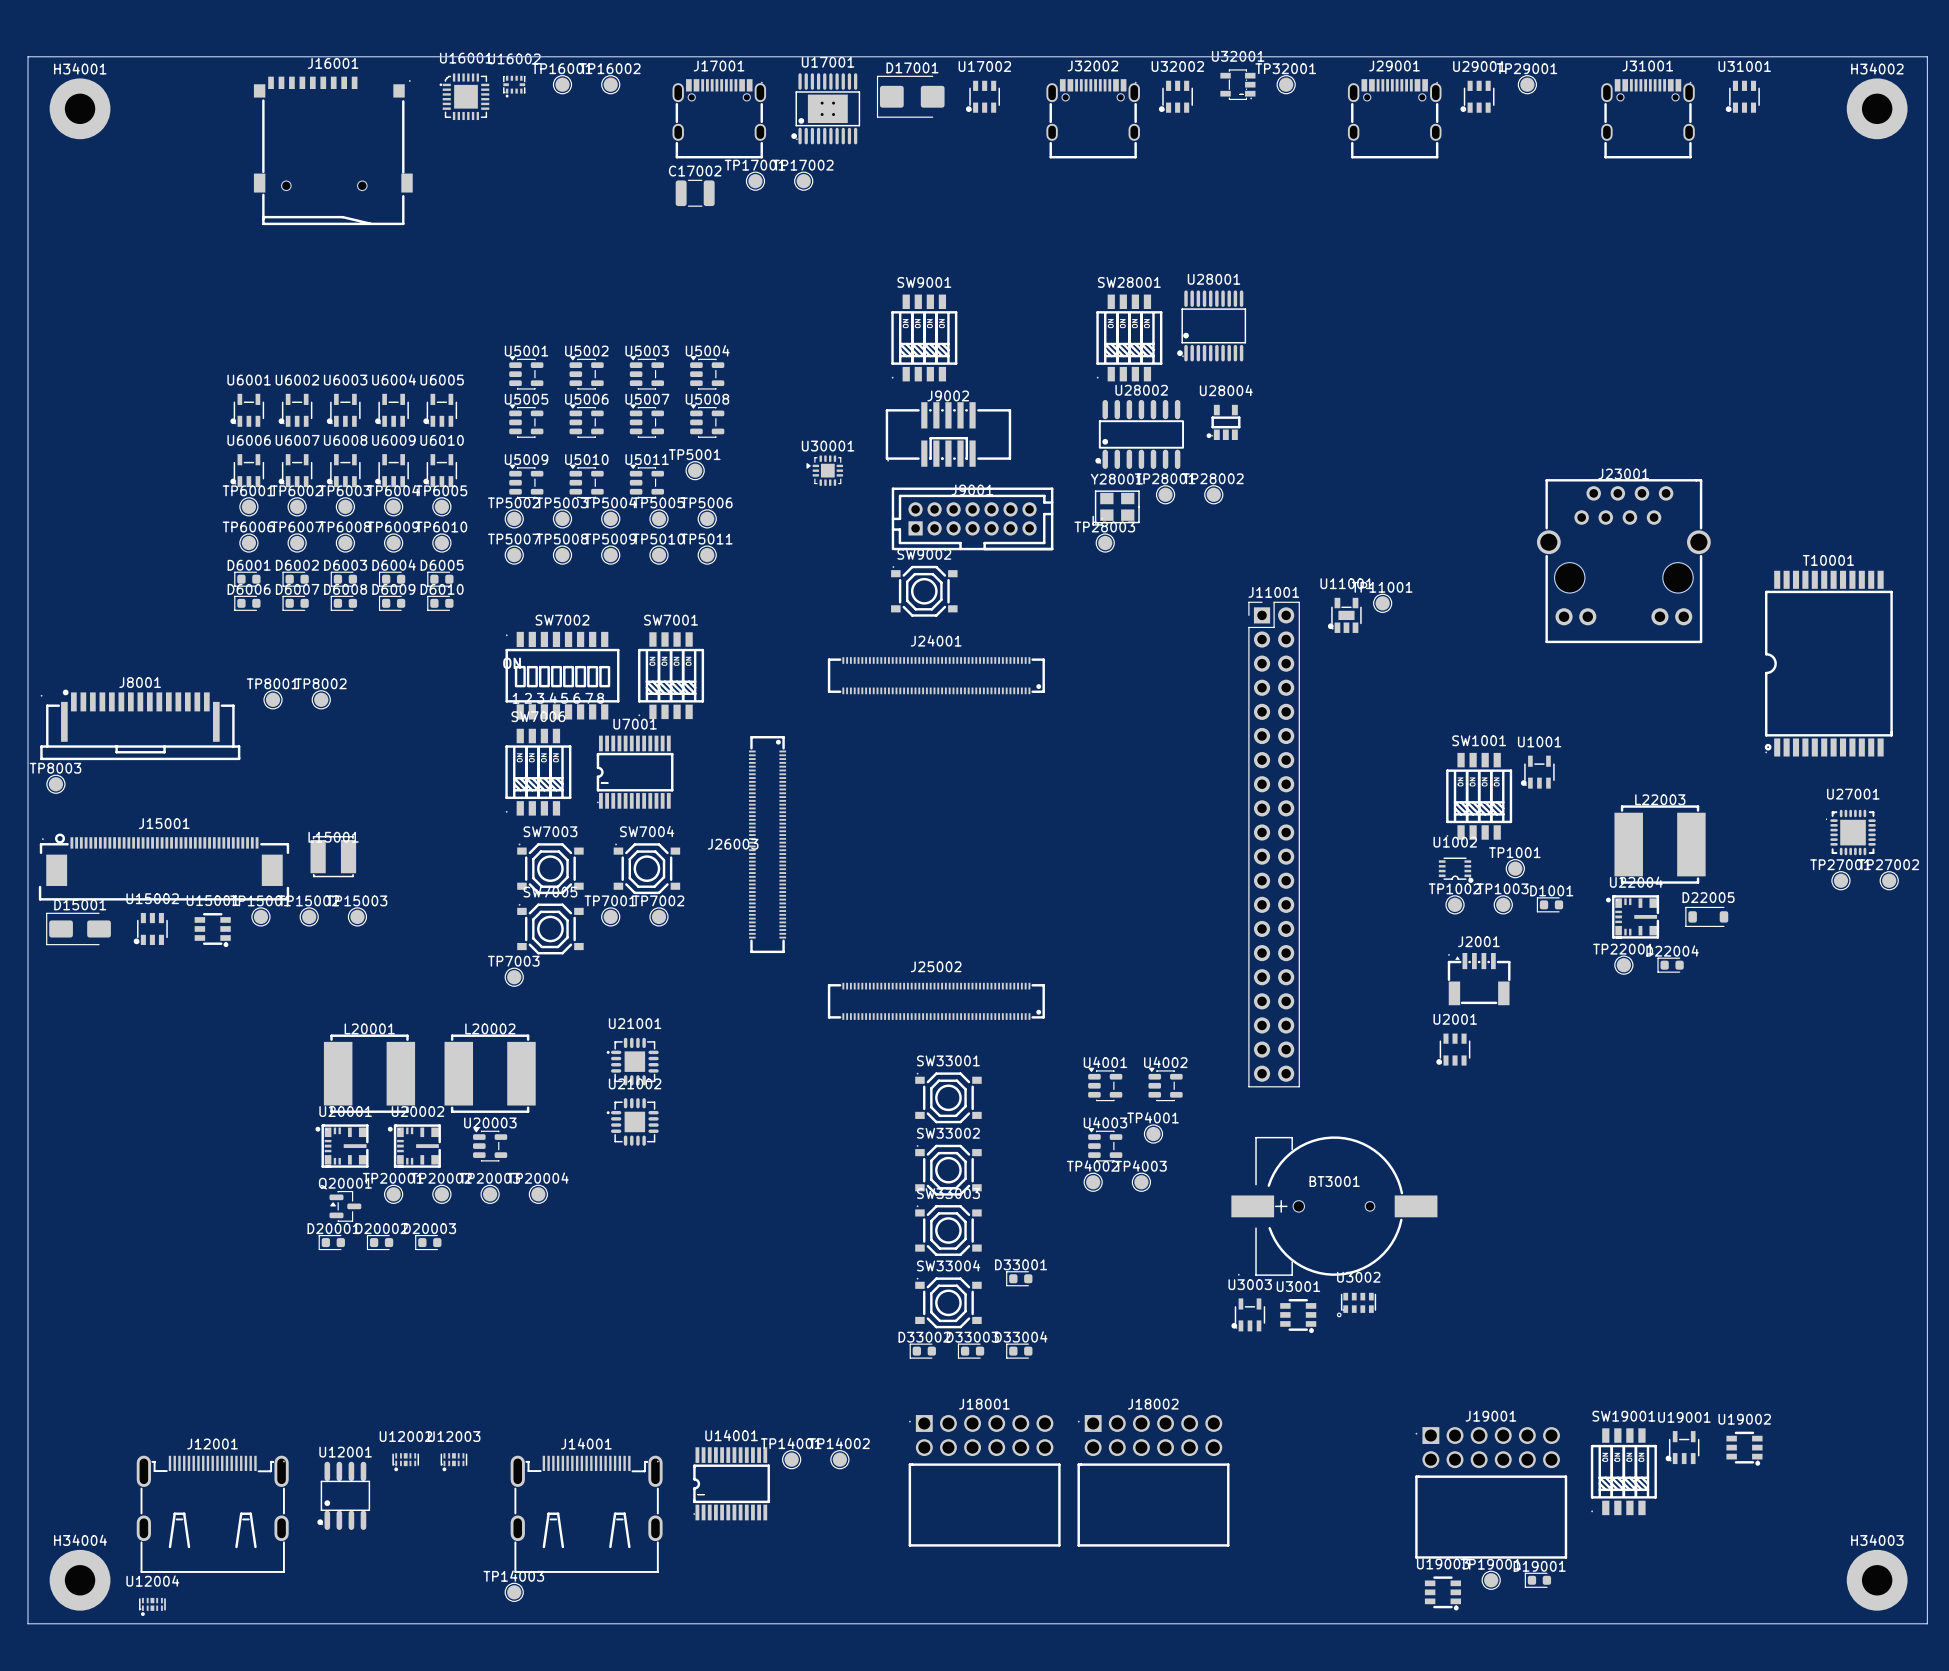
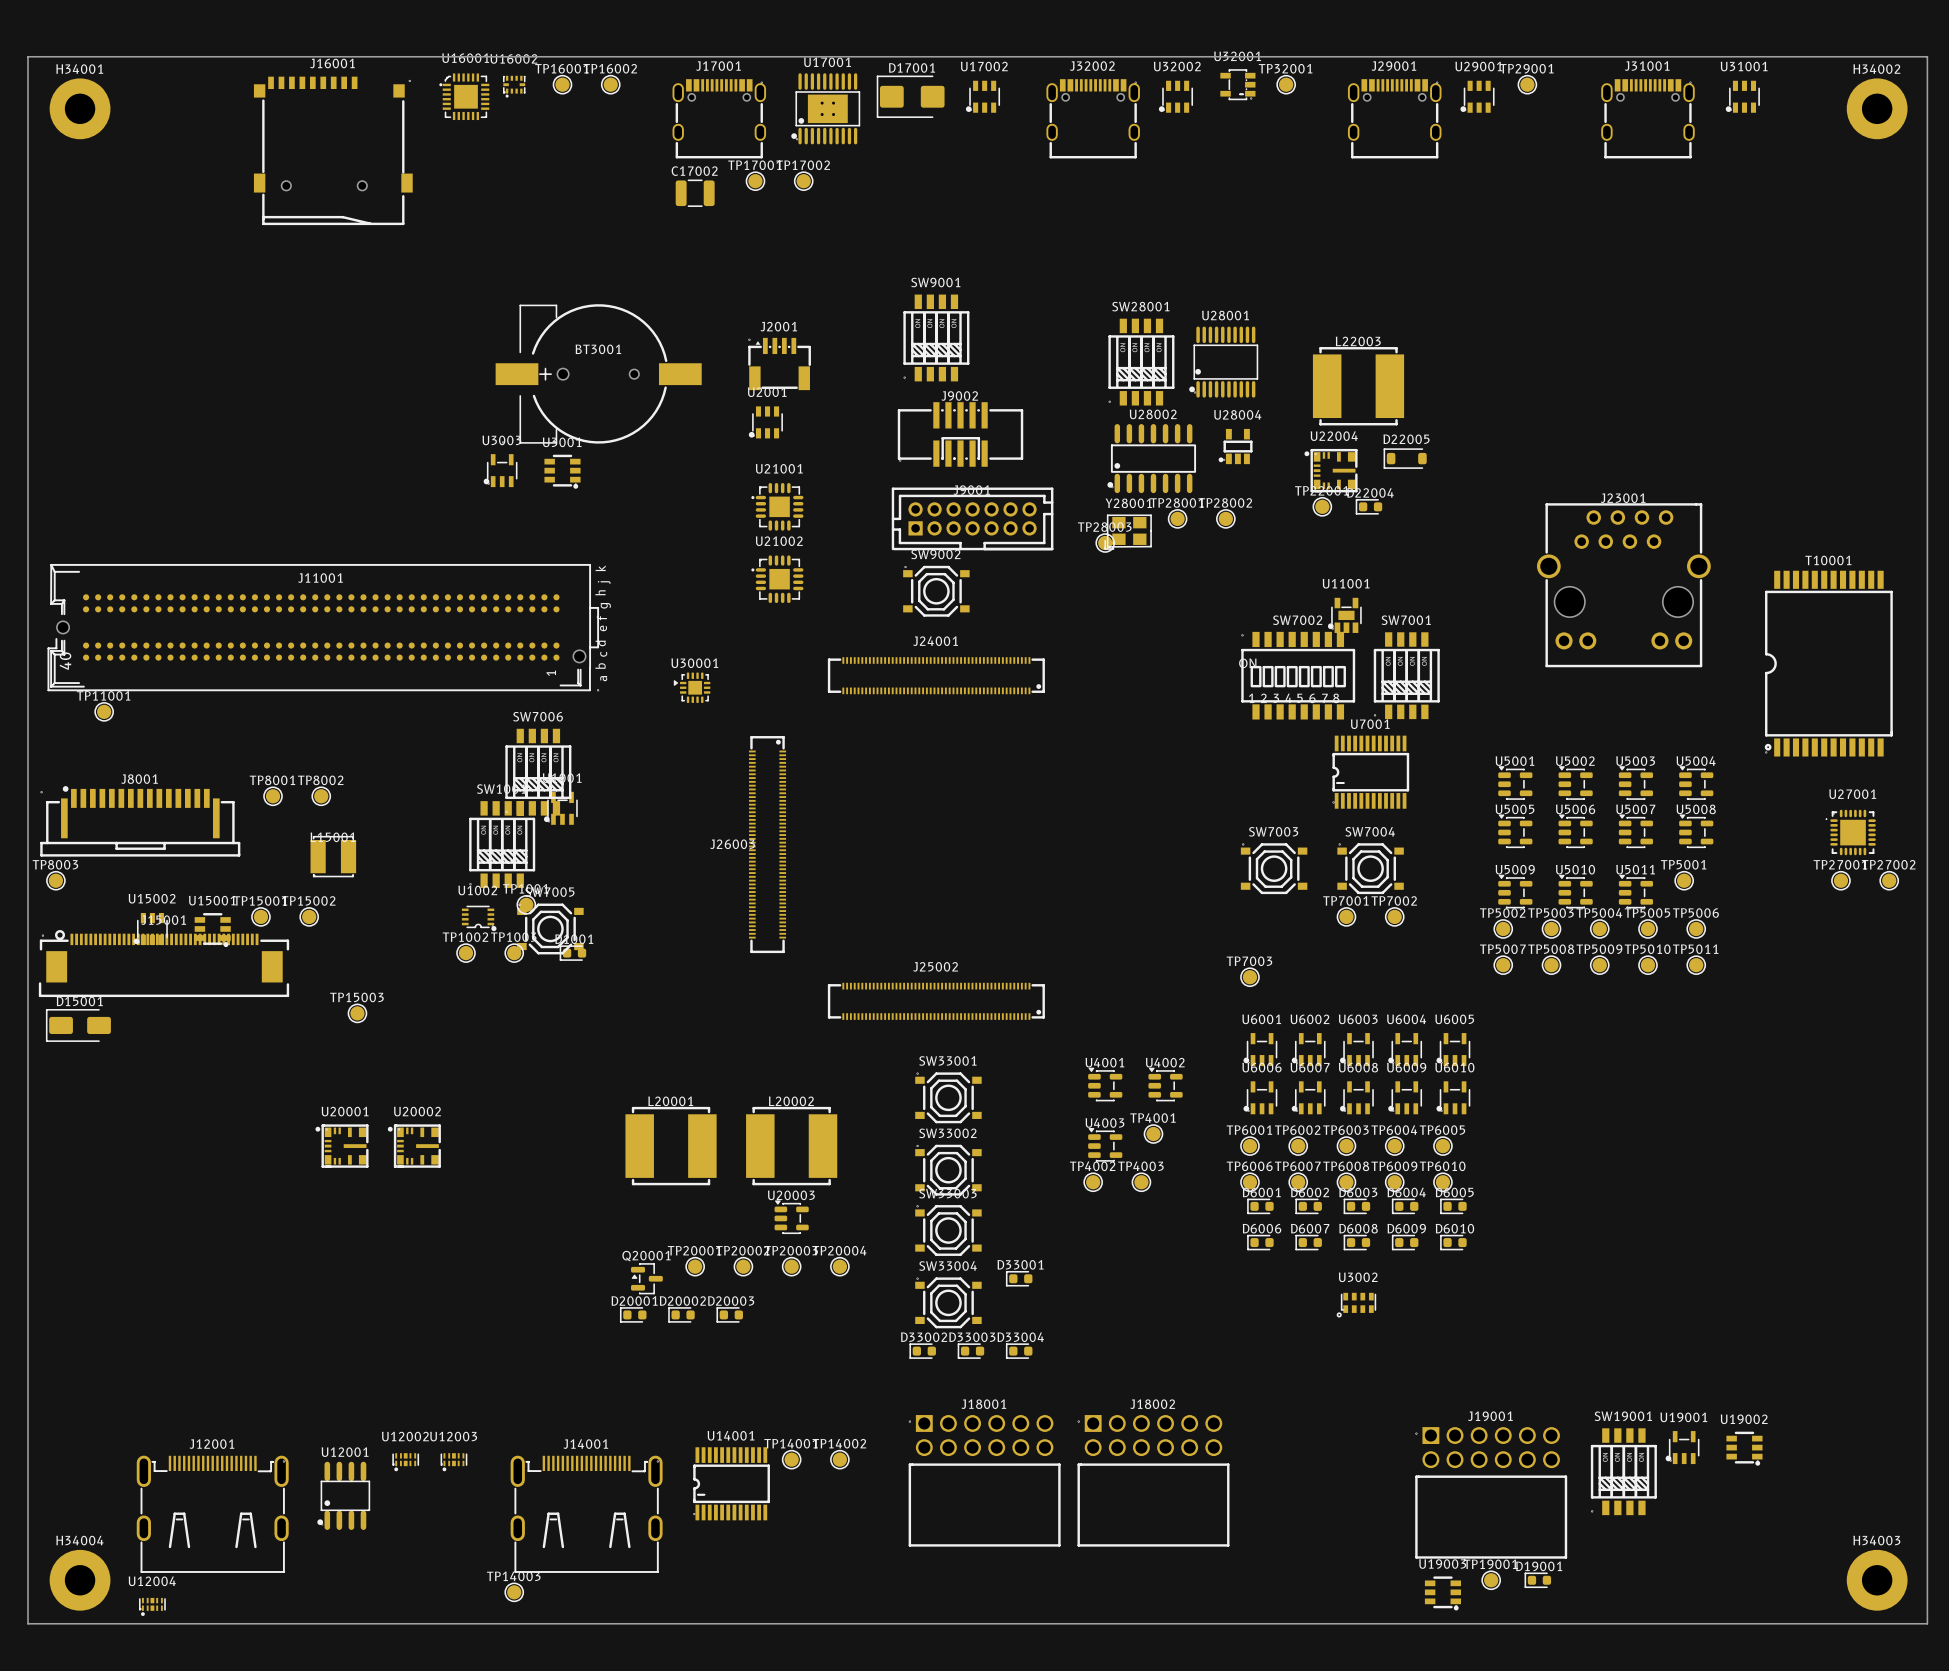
U28001 position: (1211, 325) -> (1223, 362)
SW9001 position: (924, 337) -> (936, 337)
SW28001 position: (1129, 337) -> (1141, 362)
U5001 position: (526, 372) -> (1515, 782)
U5002 position: (586, 372) -> (1575, 782)
U5003 position: (646, 372) -> (1635, 782)
U5004 position: (707, 372) -> (1696, 782)
U6001 position: (247, 410) -> (1260, 1049)
U6002 position: (295, 410) -> (1308, 1049)
U6003 position: (343, 410) -> (1356, 1049)
U6004 position: (391, 410) -> (1405, 1049)
U6005 position: (440, 410) -> (1453, 1049)
U5005 position: (526, 421) -> (1515, 831)
U5006 position: (586, 421) -> (1575, 831)
U5007 position: (646, 421) -> (1635, 831)
U5008 position: (707, 421) -> (1696, 831)
U28004 position: (1223, 422) -> (1235, 446)
J9002 position: (948, 434) -> (960, 434)
U28002 position: (1139, 434) -> (1151, 458)
U6006 position: (247, 470) -> (1260, 1097)
U6007 position: (295, 470) -> (1308, 1097)
U6008 position: (343, 470) -> (1356, 1097)
U6009 position: (391, 470) -> (1405, 1097)
U6010 position: (440, 470) -> (1453, 1097)
TP5001 position: (695, 470) -> (1684, 880)
U30001 position: (824, 470) -> (692, 687)
U5009 position: (526, 481) -> (1515, 891)
U5010 position: (586, 481) -> (1575, 891)
U5011 position: (646, 481) -> (1635, 891)
TP28001 position: (1165, 494) -> (1177, 518)
TP28002 position: (1213, 494) -> (1225, 518)
TP6001 position: (248, 506) -> (1249, 1146)
TP6002 position: (297, 506) -> (1298, 1146)
TP6003 position: (345, 506) -> (1346, 1146)
TP6004 position: (393, 506) -> (1394, 1146)
TP6005 position: (441, 506) -> (1442, 1146)
Y28001 position: (1116, 508) -> (1128, 532)
TP5002 position: (514, 518) -> (1503, 928)
TP5003 position: (562, 518) -> (1551, 928)
TP5004 position: (610, 518) -> (1599, 928)
TP5005 position: (658, 518) -> (1647, 928)
TP5006 position: (707, 518) -> (1696, 928)
TP6006 position: (248, 543) -> (1249, 1182)
TP6007 position: (297, 543) -> (1298, 1182)
TP6008 position: (345, 543) -> (1346, 1182)
TP6009 position: (393, 543) -> (1394, 1182)
TP6010 position: (441, 543) -> (1442, 1182)
TP5007 position: (514, 555) -> (1503, 965)
TP5008 position: (562, 555) -> (1551, 965)
TP5009 position: (610, 555) -> (1599, 965)
TP5010 position: (658, 555) -> (1647, 965)
TP5011 position: (707, 555) -> (1696, 965)
J23001 position: (1623, 561) -> (1623, 585)
D6001 position: (247, 579) -> (1260, 1206)
D6002 position: (295, 579) -> (1308, 1206)
D6003 position: (343, 579) -> (1357, 1206)
D6004 position: (392, 579) -> (1405, 1206)
D6005 position: (440, 579) -> (1453, 1206)
SW9002 position: (924, 591) -> (936, 591)
J11001 name position: J11001 (1273, 592) -> J11001 (320, 578)
J11001 footprint: [1248, 601, 1300, 1088] -> [47, 563, 600, 692]
D6006 position: (247, 603) -> (1260, 1242)
D6007 position: (295, 603) -> (1308, 1242)
D6008 position: (343, 603) -> (1357, 1242)
D6009 position: (392, 603) -> (1405, 1242)
D6010 position: (440, 603) -> (1453, 1242)
TP11001 position: (1382, 603) -> (104, 711)
SW7002 position: (562, 675) -> (1298, 675)
SW7001 position: (671, 675) -> (1406, 675)
TP8001 position: (273, 699) -> (273, 796)
TP8002 position: (321, 699) -> (321, 796)
J8001 position: (140, 724) -> (140, 821)
U7001 position: (635, 772) -> (1370, 772)
U1001 position: (1537, 772) -> (560, 808)
TP8003 position: (55, 784) -> (55, 880)
SW1001 position: (1479, 796) -> (502, 844)
L22003 position: (1660, 844) -> (1358, 386)
J15001 position: (164, 867) -> (164, 963)
SW7003 position: (550, 868) -> (1274, 868)
SW7004 position: (646, 868) -> (1370, 868)
TP1001 position: (1515, 868) -> (526, 904)
U1002 position: (1456, 870) -> (479, 918)
TP1002 position: (1455, 904) -> (466, 953)
TP1003 position: (1503, 904) -> (514, 953)
D1001 position: (1549, 904) -> (573, 953)
TP15003 position: (357, 916) -> (357, 1013)
TP7001 position: (610, 916) -> (1346, 916)
TP7002 position: (658, 916) -> (1394, 916)
U22004 position: (1632, 916) -> (1331, 470)
D22005 position: (1706, 916) -> (1405, 458)
D15001 position: (78, 928) -> (78, 1025)
TP22001 position: (1623, 965) -> (1322, 506)
D22004 position: (1670, 965) -> (1369, 506)
TP7003 position: (514, 977) -> (1249, 977)
J2001 position: (1479, 979) -> (779, 364)
U2001 position: (1453, 1049) -> (765, 422)
U21001 position: (632, 1061) -> (777, 506)
L20001 position: (369, 1073) -> (671, 1146)
L20002 position: (490, 1073) -> (791, 1146)
U21002 position: (632, 1121) -> (777, 579)
U20003 position: (490, 1144) -> (791, 1217)
TP20001 position: (393, 1194) -> (695, 1266)
TP20002 position: (441, 1194) -> (743, 1266)
TP20003 position: (490, 1194) -> (791, 1266)
TP20004 position: (538, 1194) -> (839, 1266)
Q20001 position: (345, 1206) -> (646, 1278)
BT3001 position: (1334, 1206) -> (598, 373)
D20001 position: (331, 1242) -> (633, 1314)
D20002 position: (380, 1242) -> (681, 1314)
D20003 position: (428, 1242) -> (729, 1314)
U3003 position: (1248, 1314) -> (500, 470)
U3001 position: (1298, 1316) -> (562, 471)

